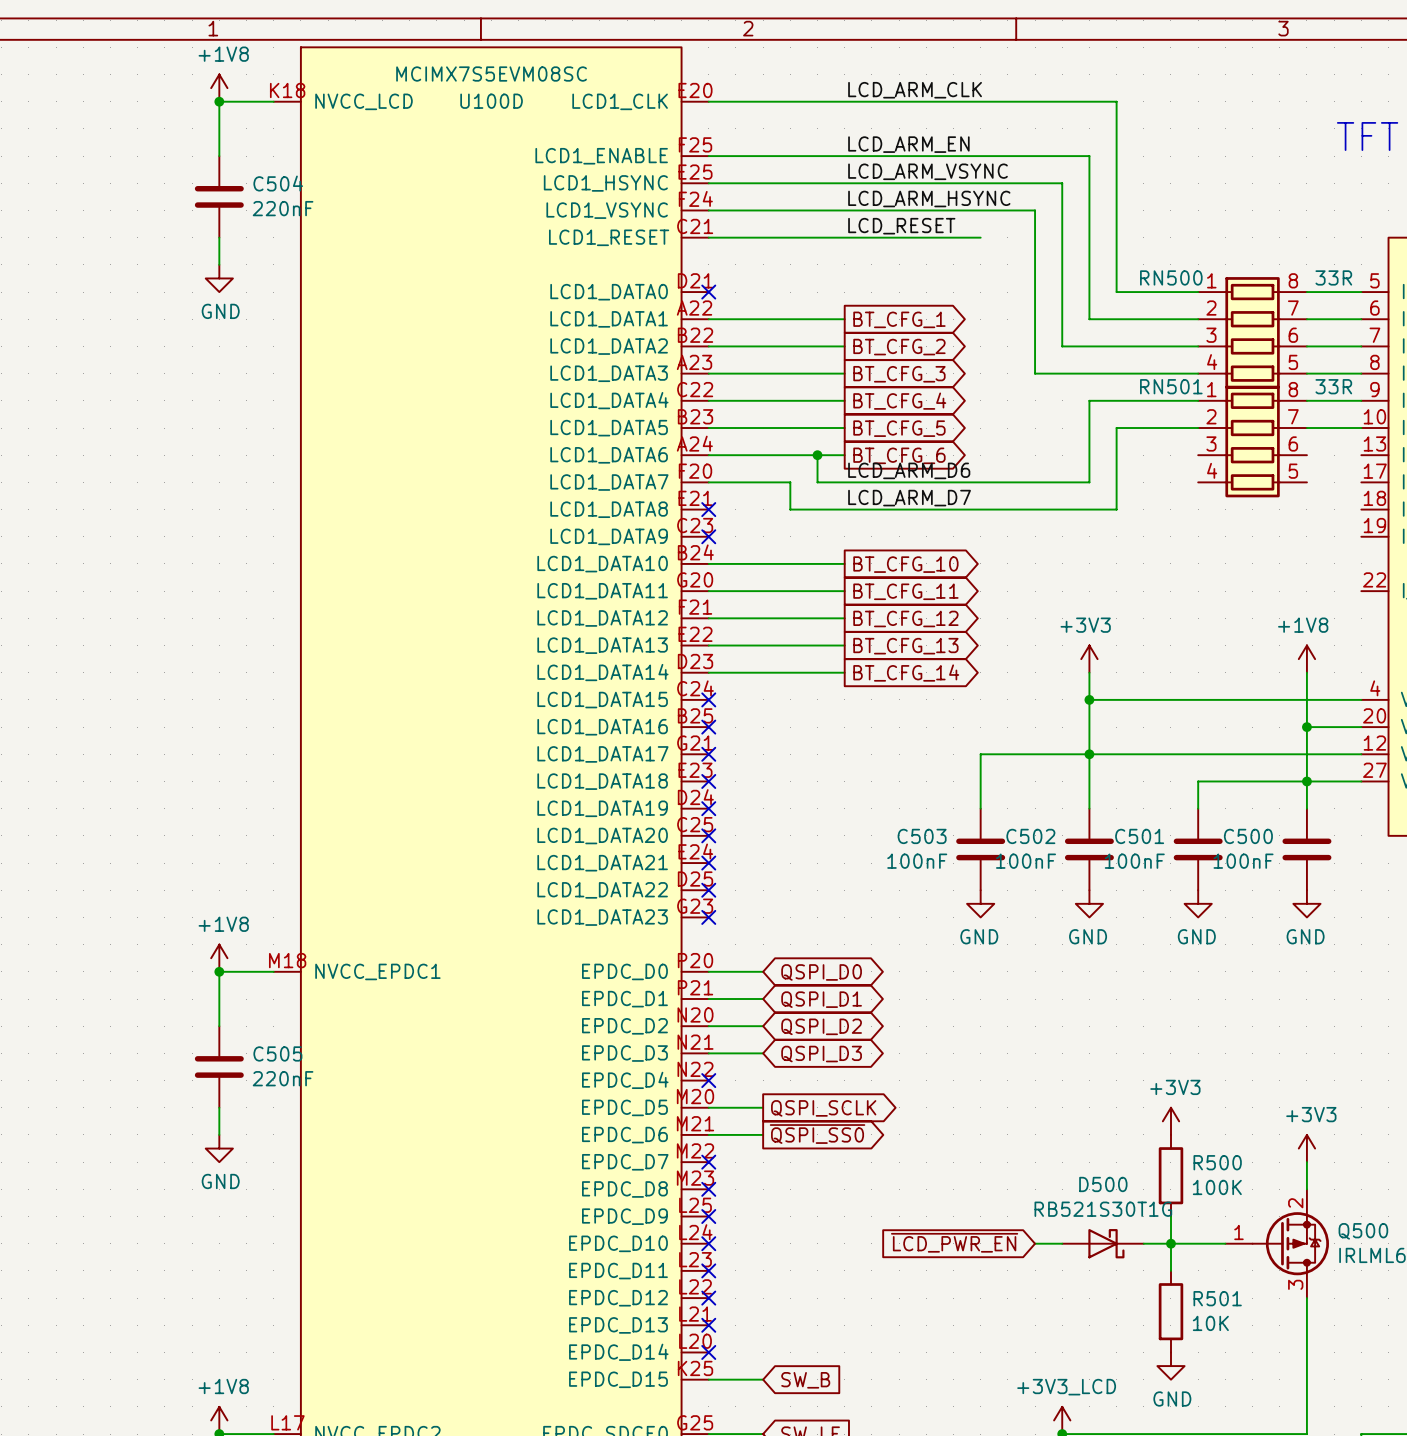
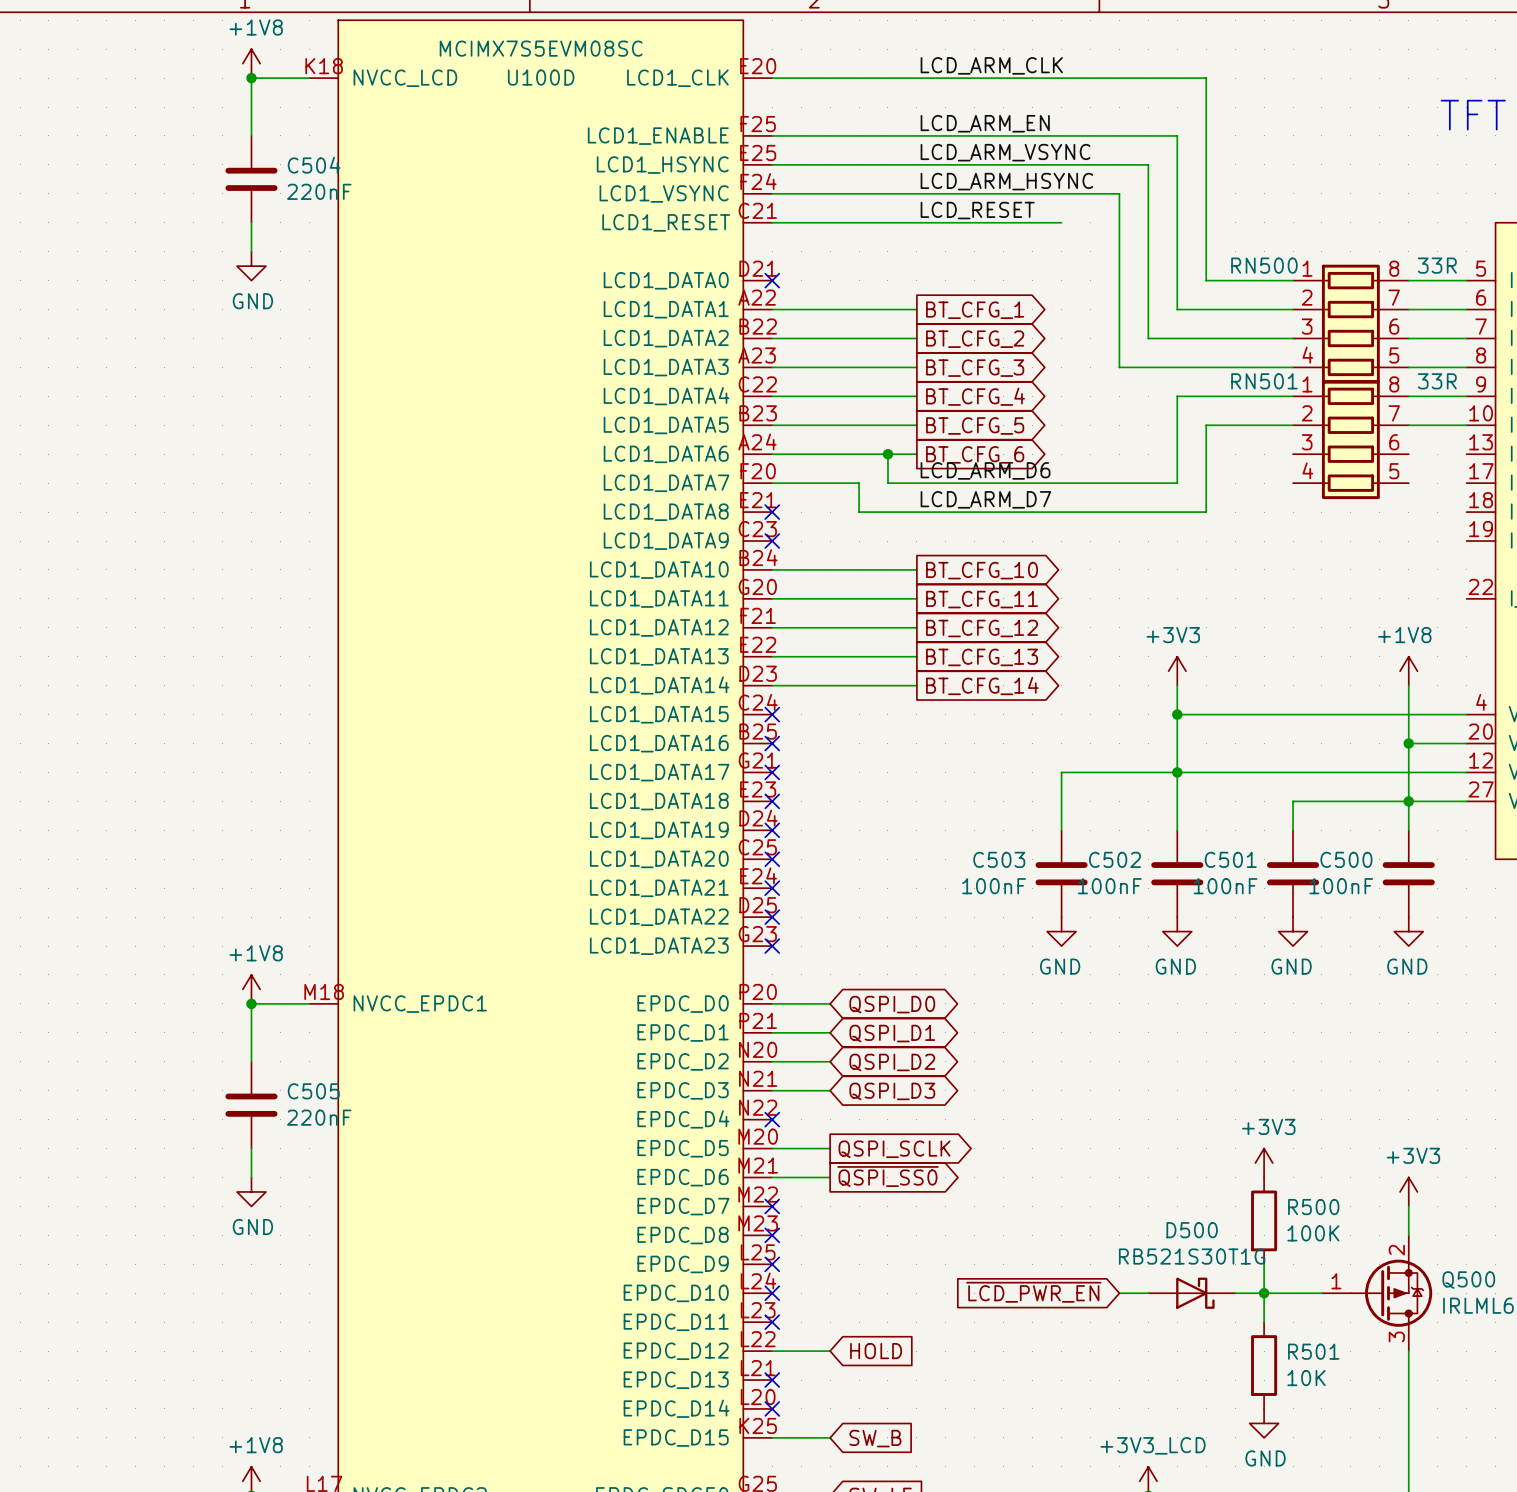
wire: none -> (772, 1351) (830, 1351)
no-connect mark: (708, 1298) -> none
global label: none -> HOLD (876, 1351)

